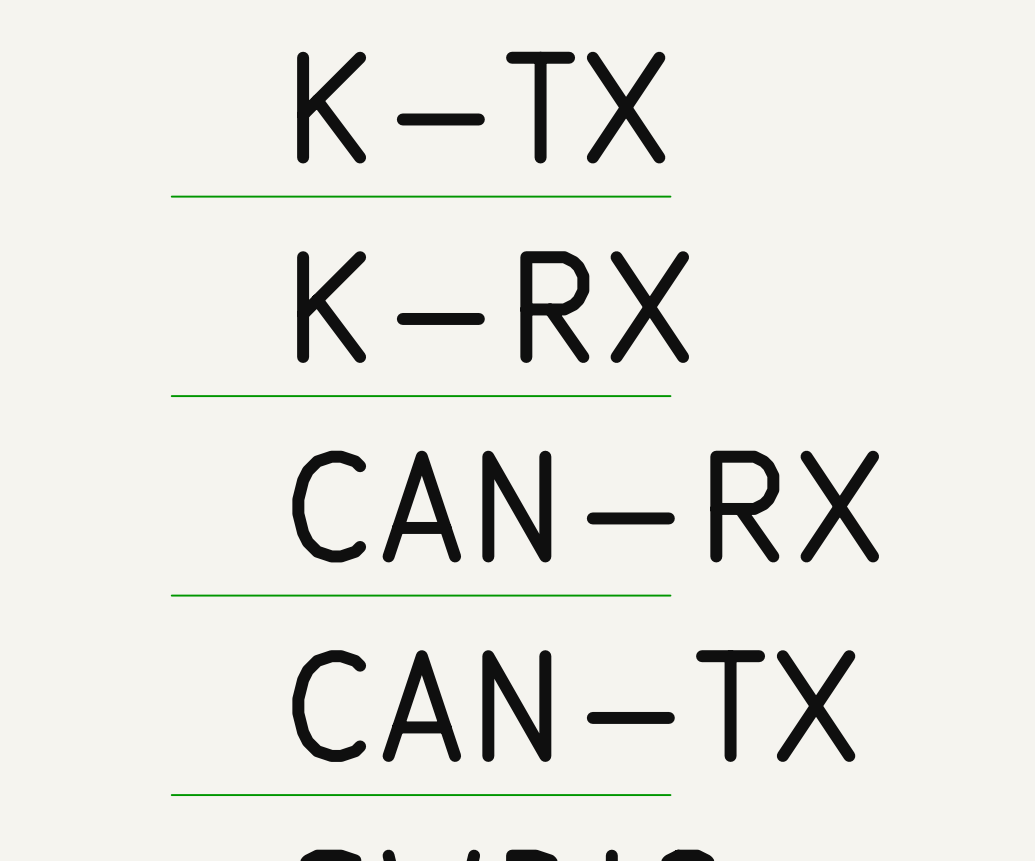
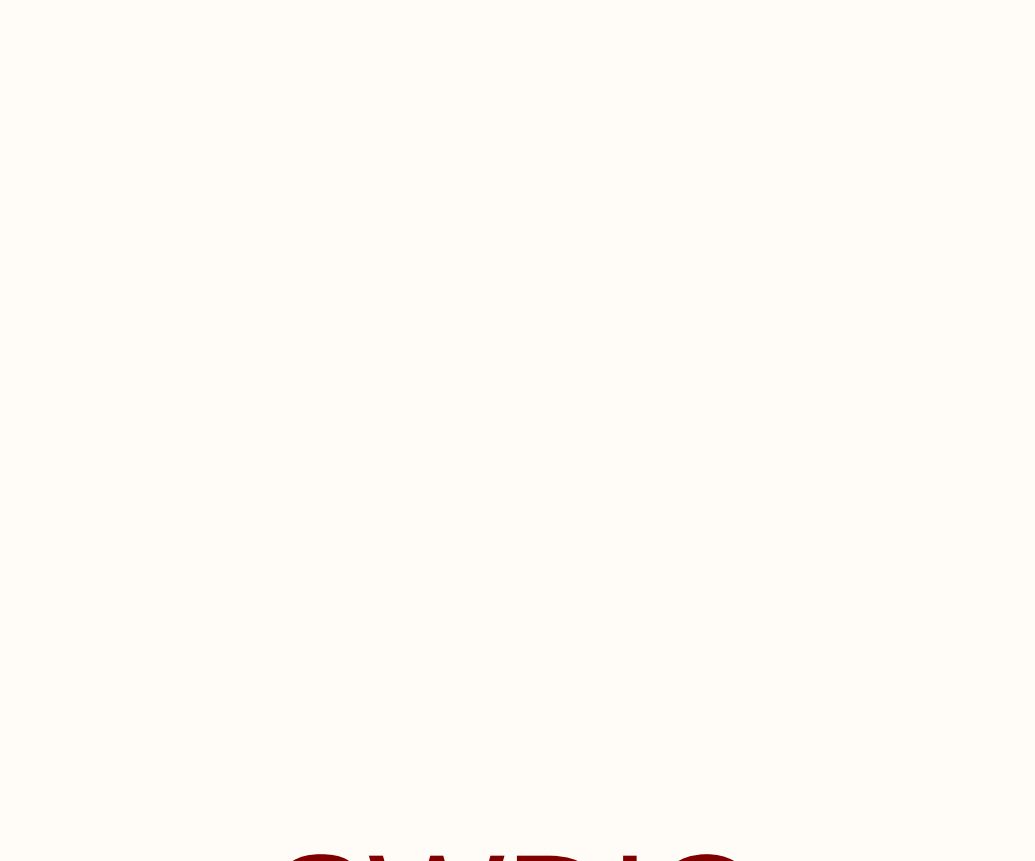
label: K-TX (481, 107) -> none
wire: (171, 196) (670, 196) -> none
label: K-RX (493, 307) -> none
wire: (171, 396) (670, 396) -> none
label: CAN-RX (585, 506) -> none
wire: (171, 595) (670, 595) -> none
label: CAN-TX (573, 706) -> none
wire: (171, 795) (670, 795) -> none

